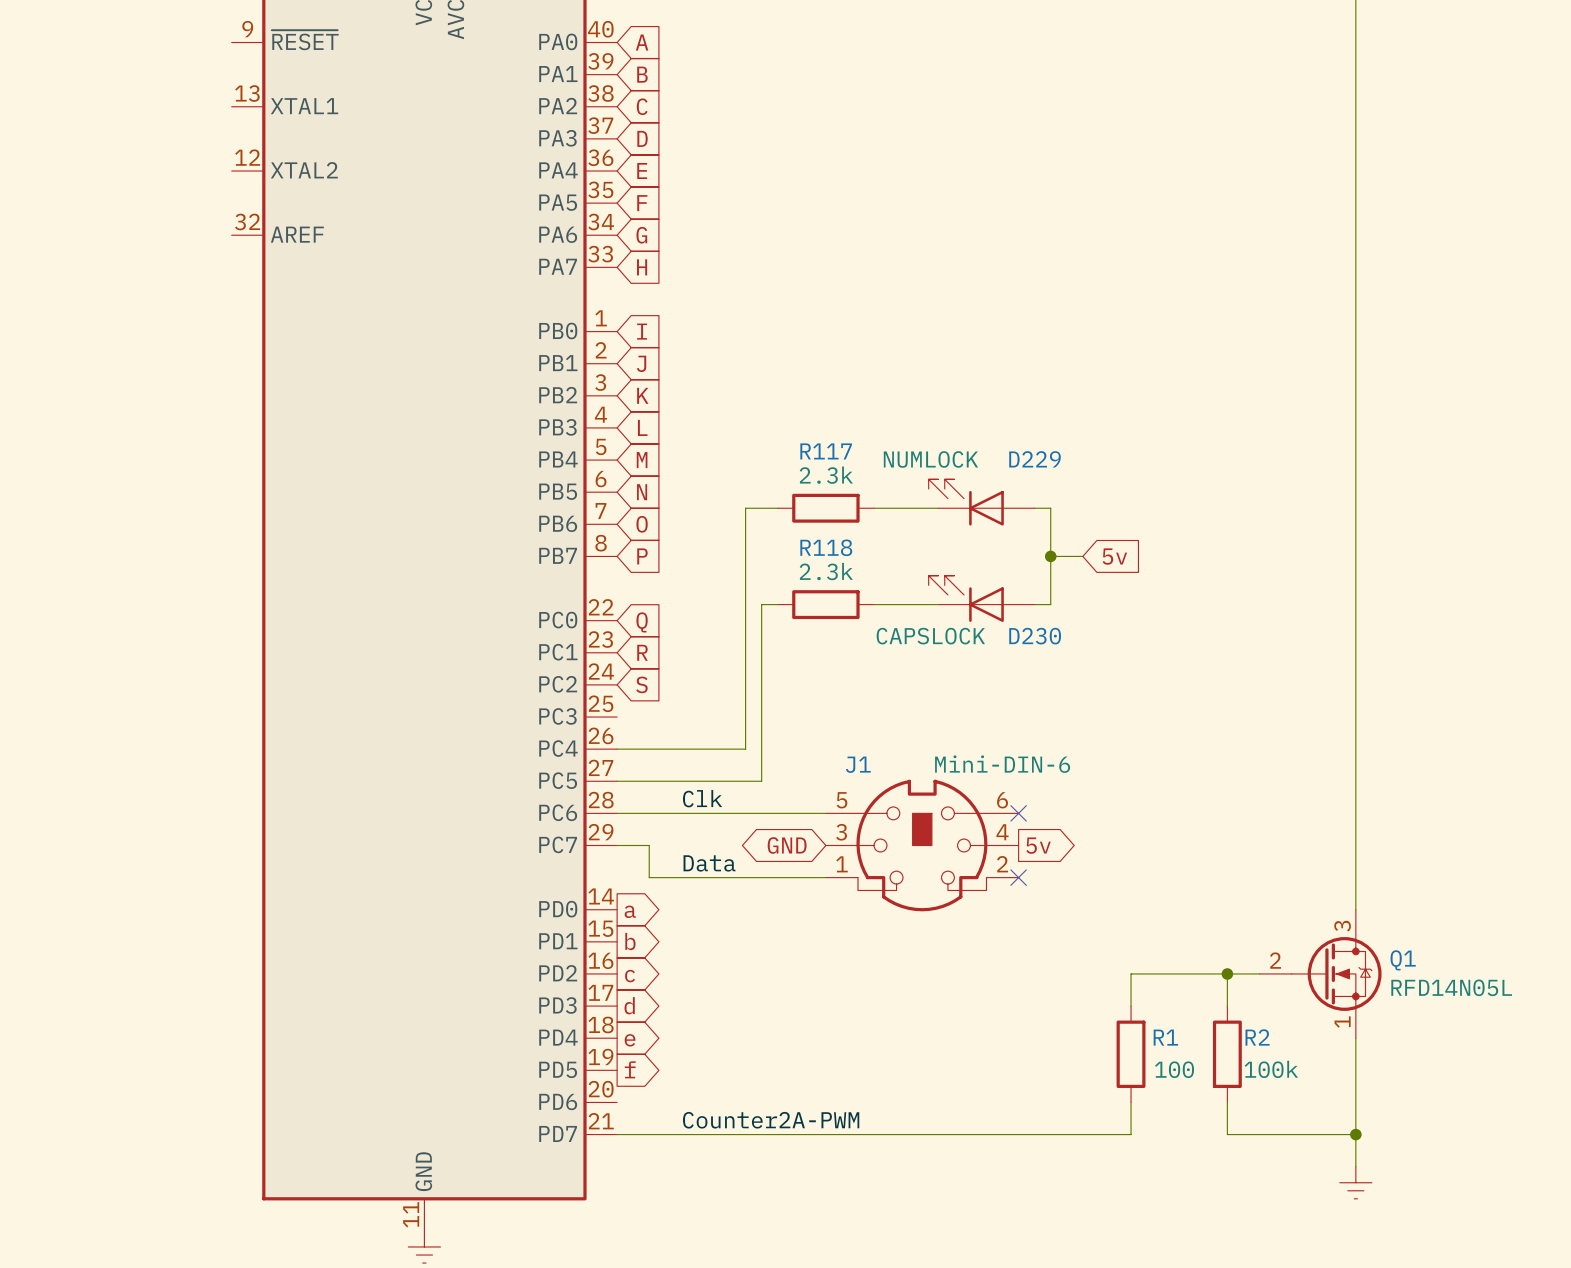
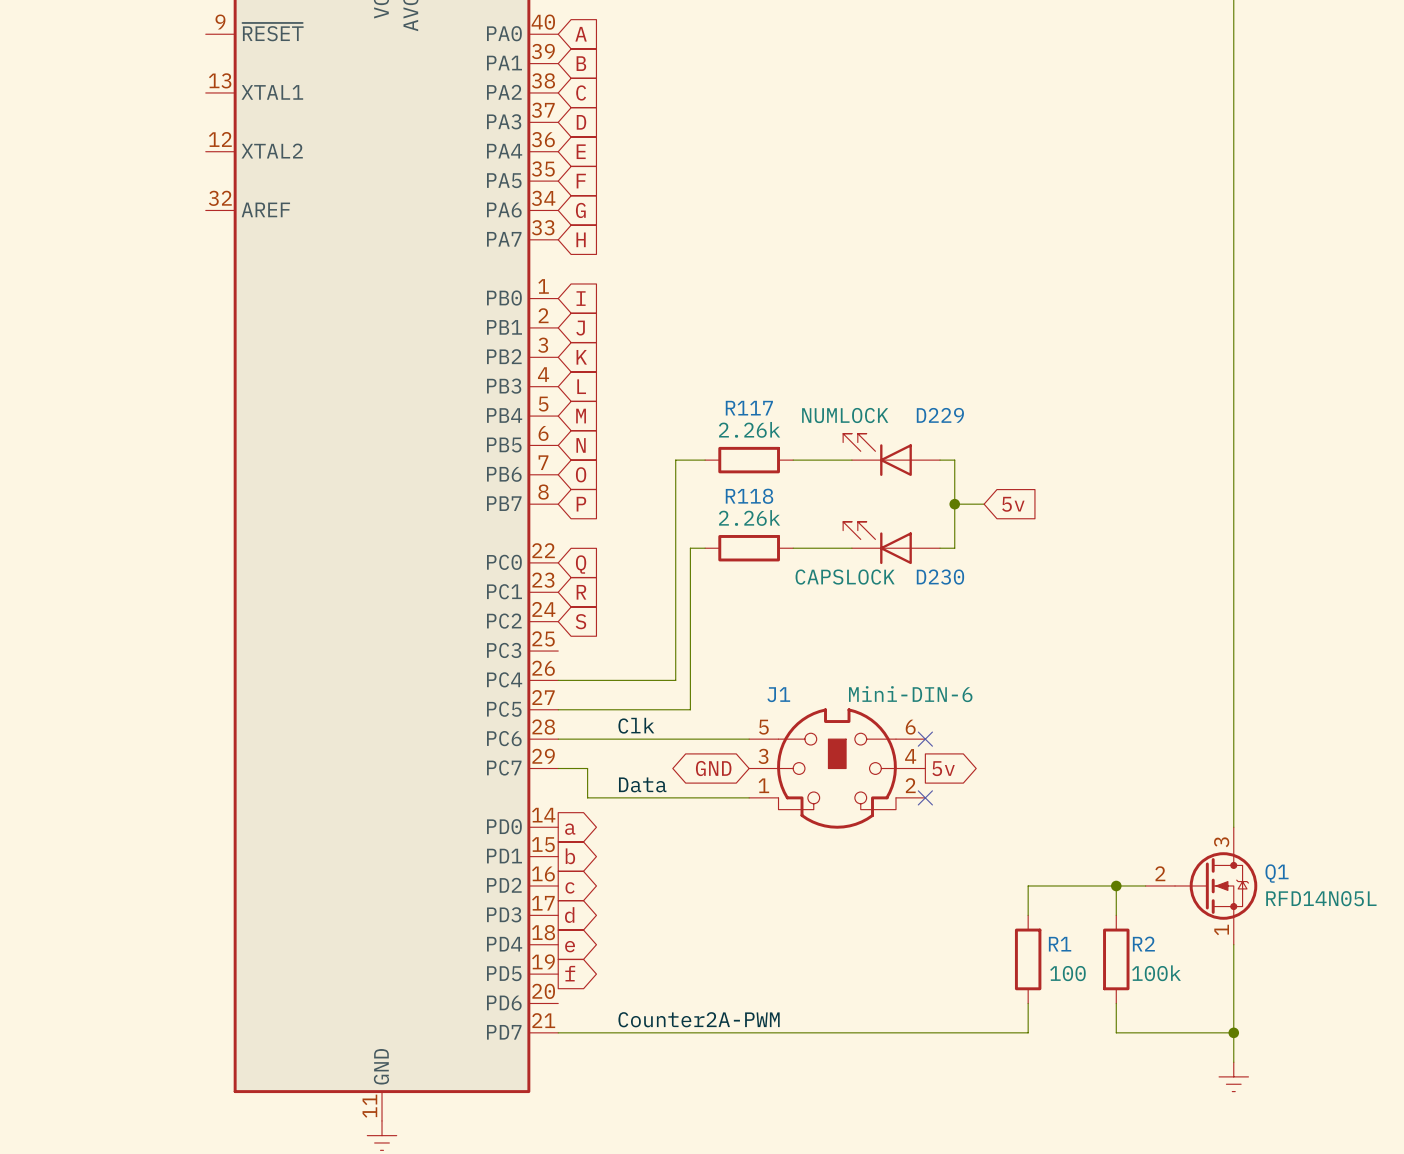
R117 value: 2.3k (826, 475) -> 2.26k (749, 429)
R118 value: 2.3k (826, 571) -> 2.26k (749, 517)

